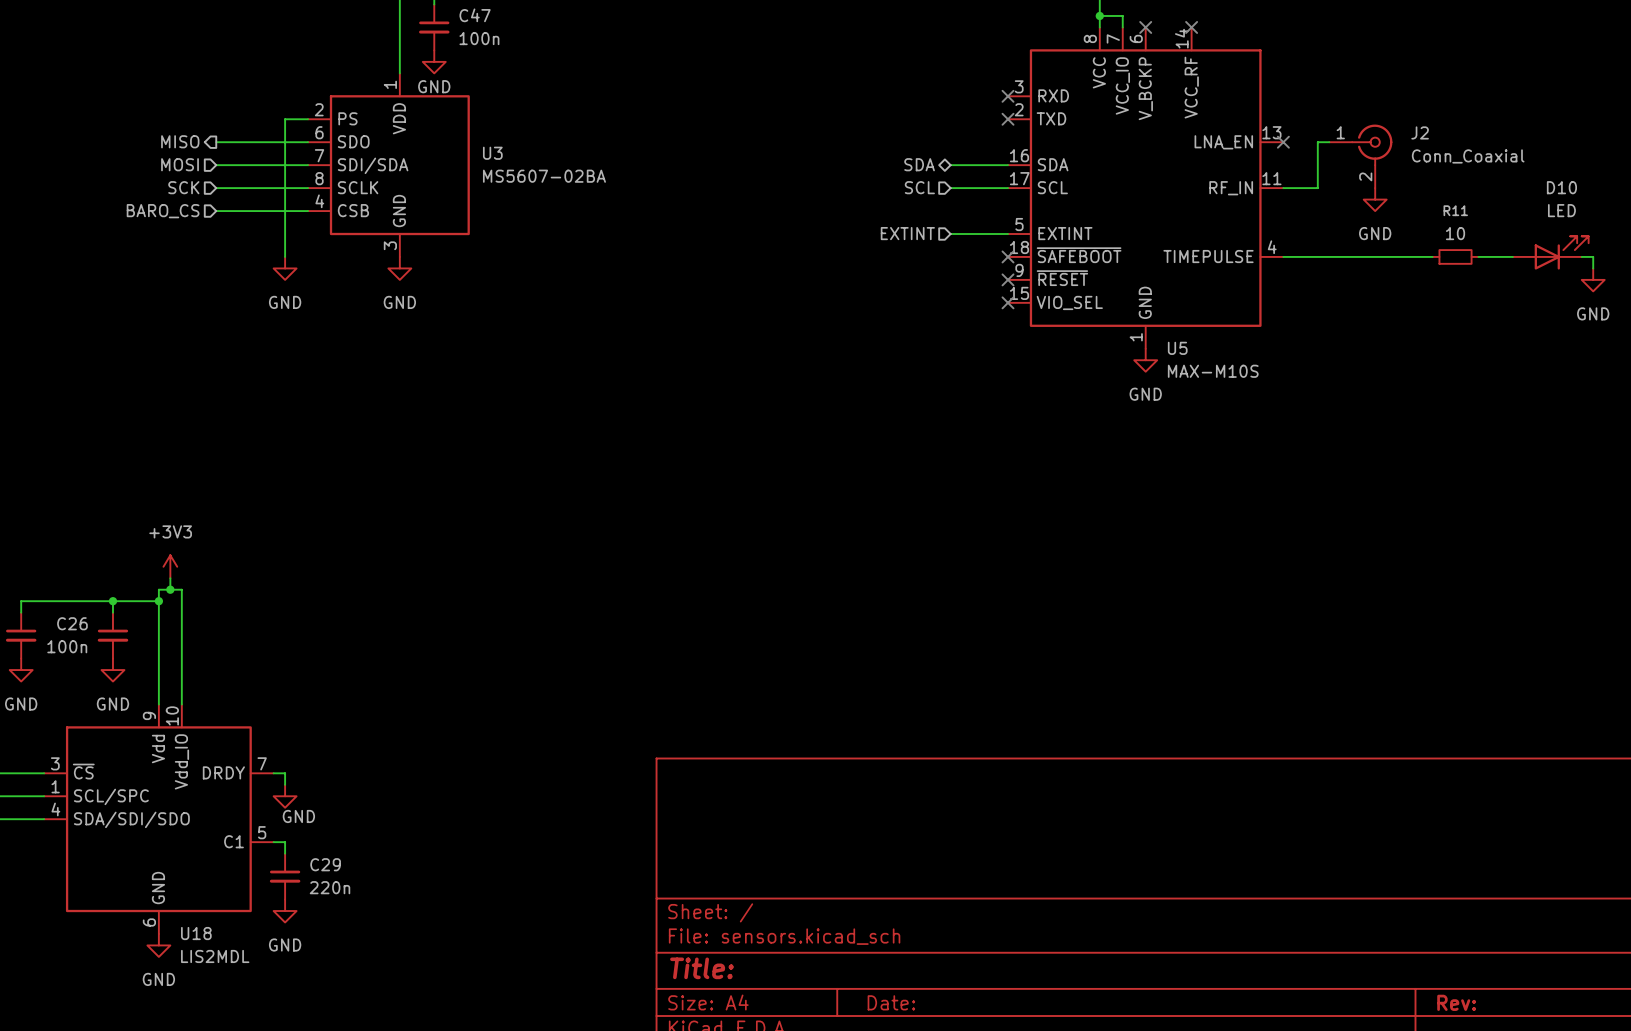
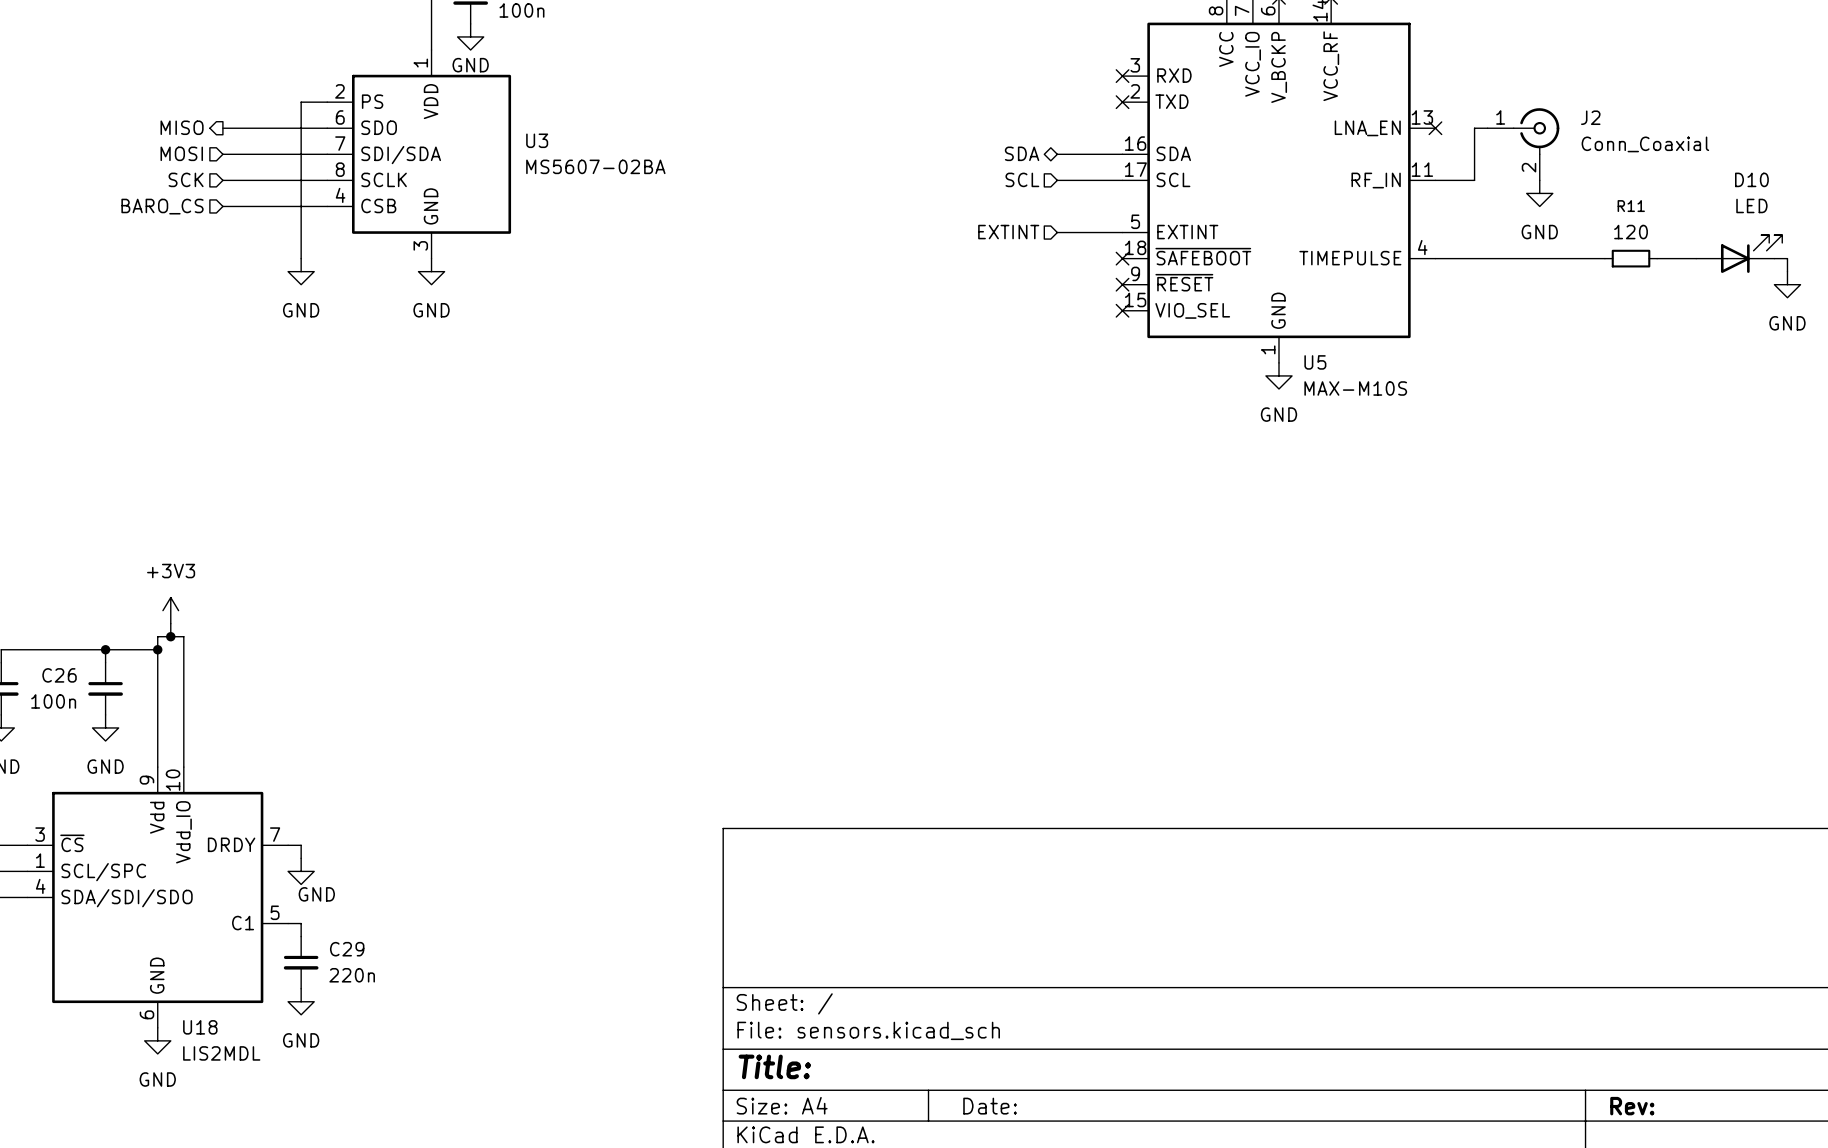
R11 value: 10 (1455, 233) -> 120 (1631, 232)

